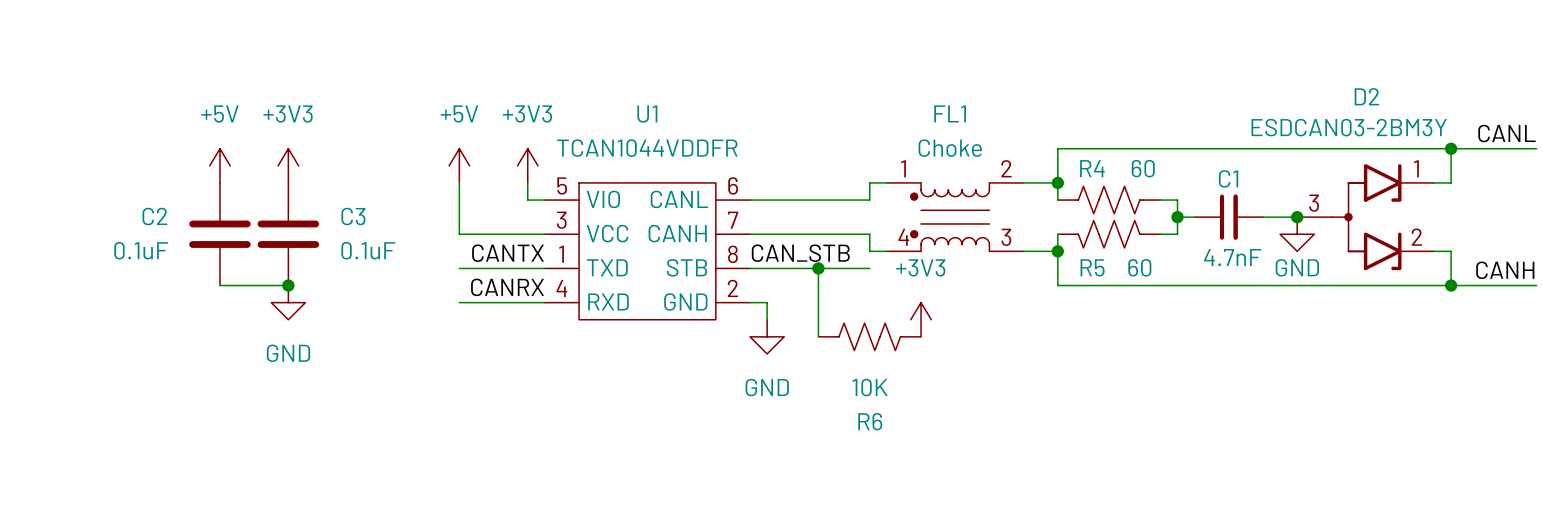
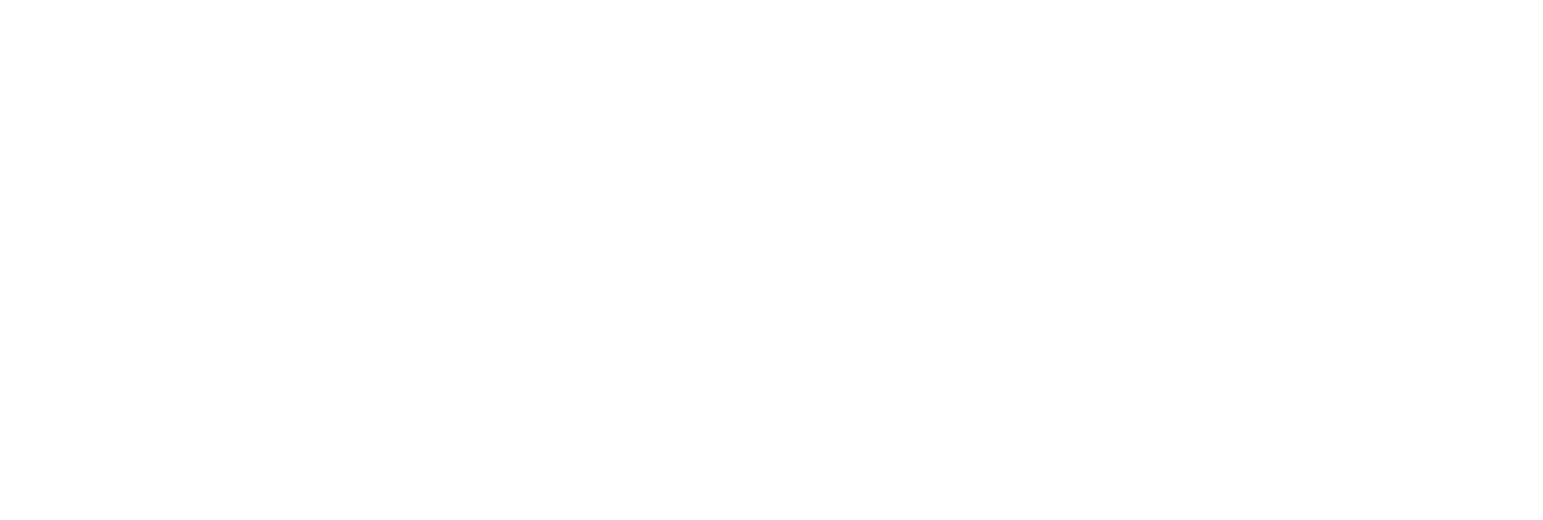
label: CANL (1507, 133) -> none
wire: (1451, 148) (1451, 182) (1434, 182) -> none
junction: (1451, 148) -> none
wire: (1536, 148) (1057, 148) (1057, 200) -> none
power symbol: +5V (219, 165) -> none
power symbol: +3V3 (288, 165) -> none
power symbol: +5V (459, 165) -> none
power symbol: +3V3 (527, 165) -> none
wire: (459, 182) (459, 234) (544, 234) -> none
wire: (527, 182) (527, 200) (544, 200) -> none
wire: (886, 182) (869, 182) (869, 200) (750, 200) -> none
wire: (1023, 182) (1057, 182) -> none
junction: (1057, 182) -> none
R4: 60 (1109, 200) -> none
wire: (1160, 200) (1177, 200) (1177, 234) (1160, 234) -> none
FL1: Choke (955, 217) -> none
wire: (1177, 217) (1194, 217) -> none
junction: (1177, 217) -> none
C1: 4.7nF (1228, 217) -> none
wire: (1263, 217) (1297, 217) -> none
junction: (1297, 217) -> none
D2: ESDCAN03-2BM3Y (1365, 217) -> none
C2: 0.1uF (219, 234) -> none
C3: 0.1uF (288, 234) -> none
wire: (750, 234) (869, 234) (869, 251) (886, 251) -> none
wire: (1057, 234) (1057, 285) (1536, 285) -> none
R5: 60 (1109, 234) -> none
power symbol: GND (1297, 234) -> none
U1: TCAN1044VDDFR (647, 251) -> none
wire: (1023, 251) (1057, 251) -> none
junction: (1057, 251) -> none
wire: (1434, 251) (1451, 251) (1451, 285) -> none
label: CANTX (508, 253) -> none
label: CAN_STB (800, 253) -> none
wire: (459, 268) (544, 268) -> none
wire: (750, 268) (869, 268) -> none
wire: (818, 268) (818, 336) -> none
junction: (818, 268) -> none
label: CANH (1505, 270) -> none
wire: (219, 285) (288, 285) -> none
junction: (288, 285) -> none
junction: (1451, 285) -> none
label: CANRX (507, 287) -> none
power symbol: GND (288, 302) -> none
wire: (459, 302) (544, 302) -> none
wire: (750, 302) (767, 302) (767, 319) -> none
power symbol: +3V3 (921, 319) -> none
power symbol: GND (767, 336) -> none
R6: 10K (869, 336) -> none

